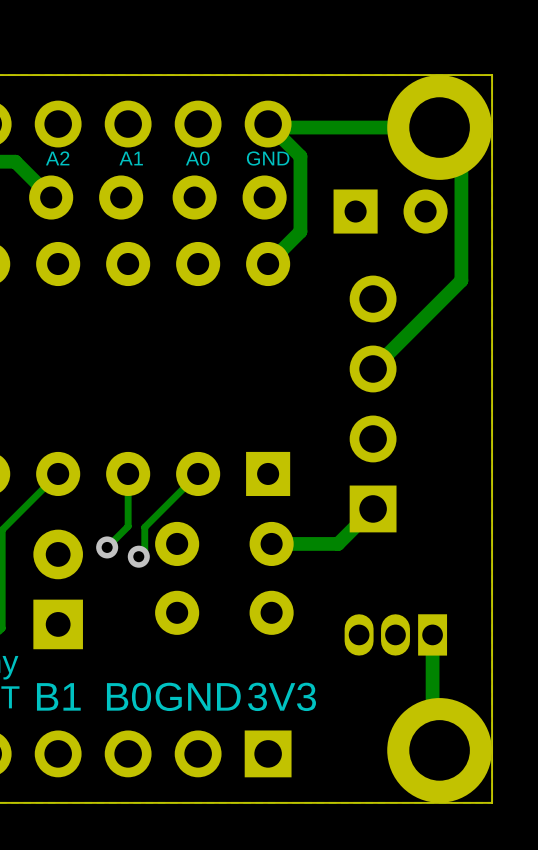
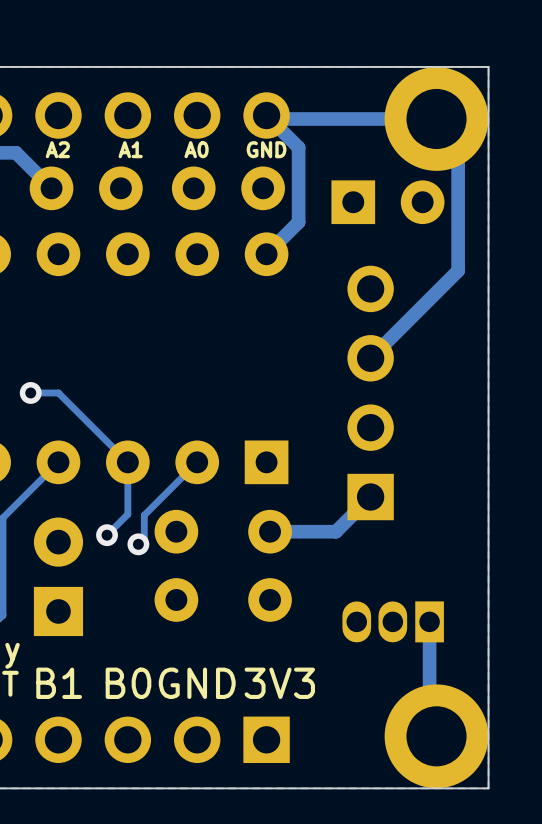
track: none -> (30, 392) (58, 392) (127, 462)
via: none -> (30, 392)

